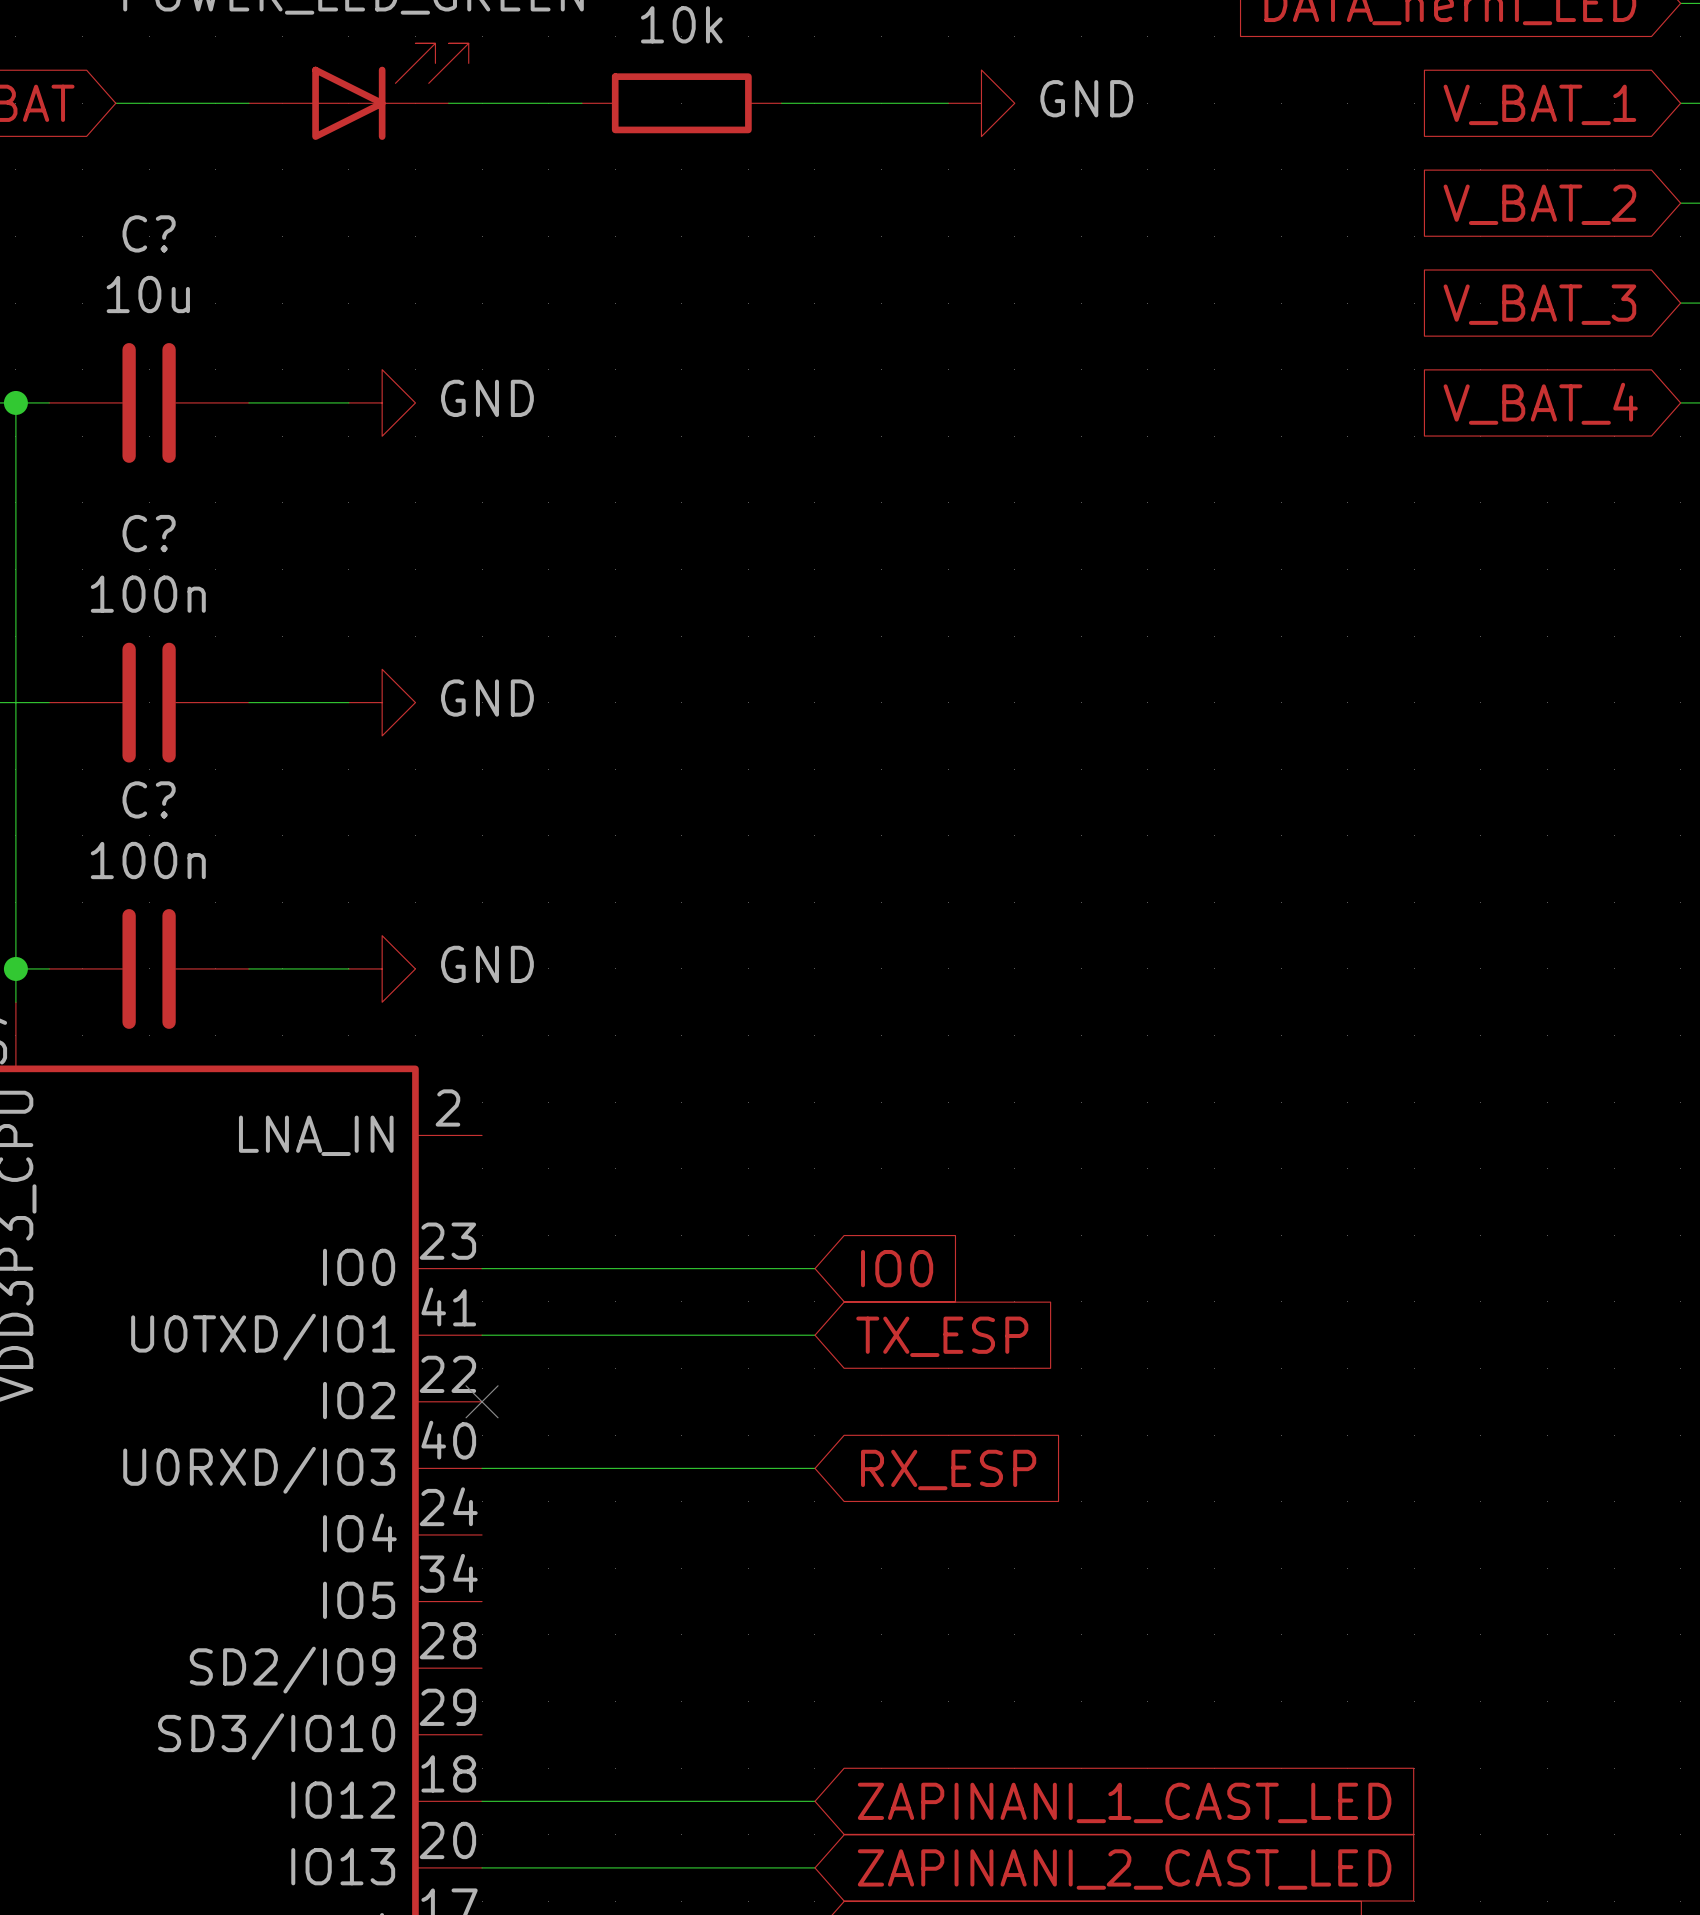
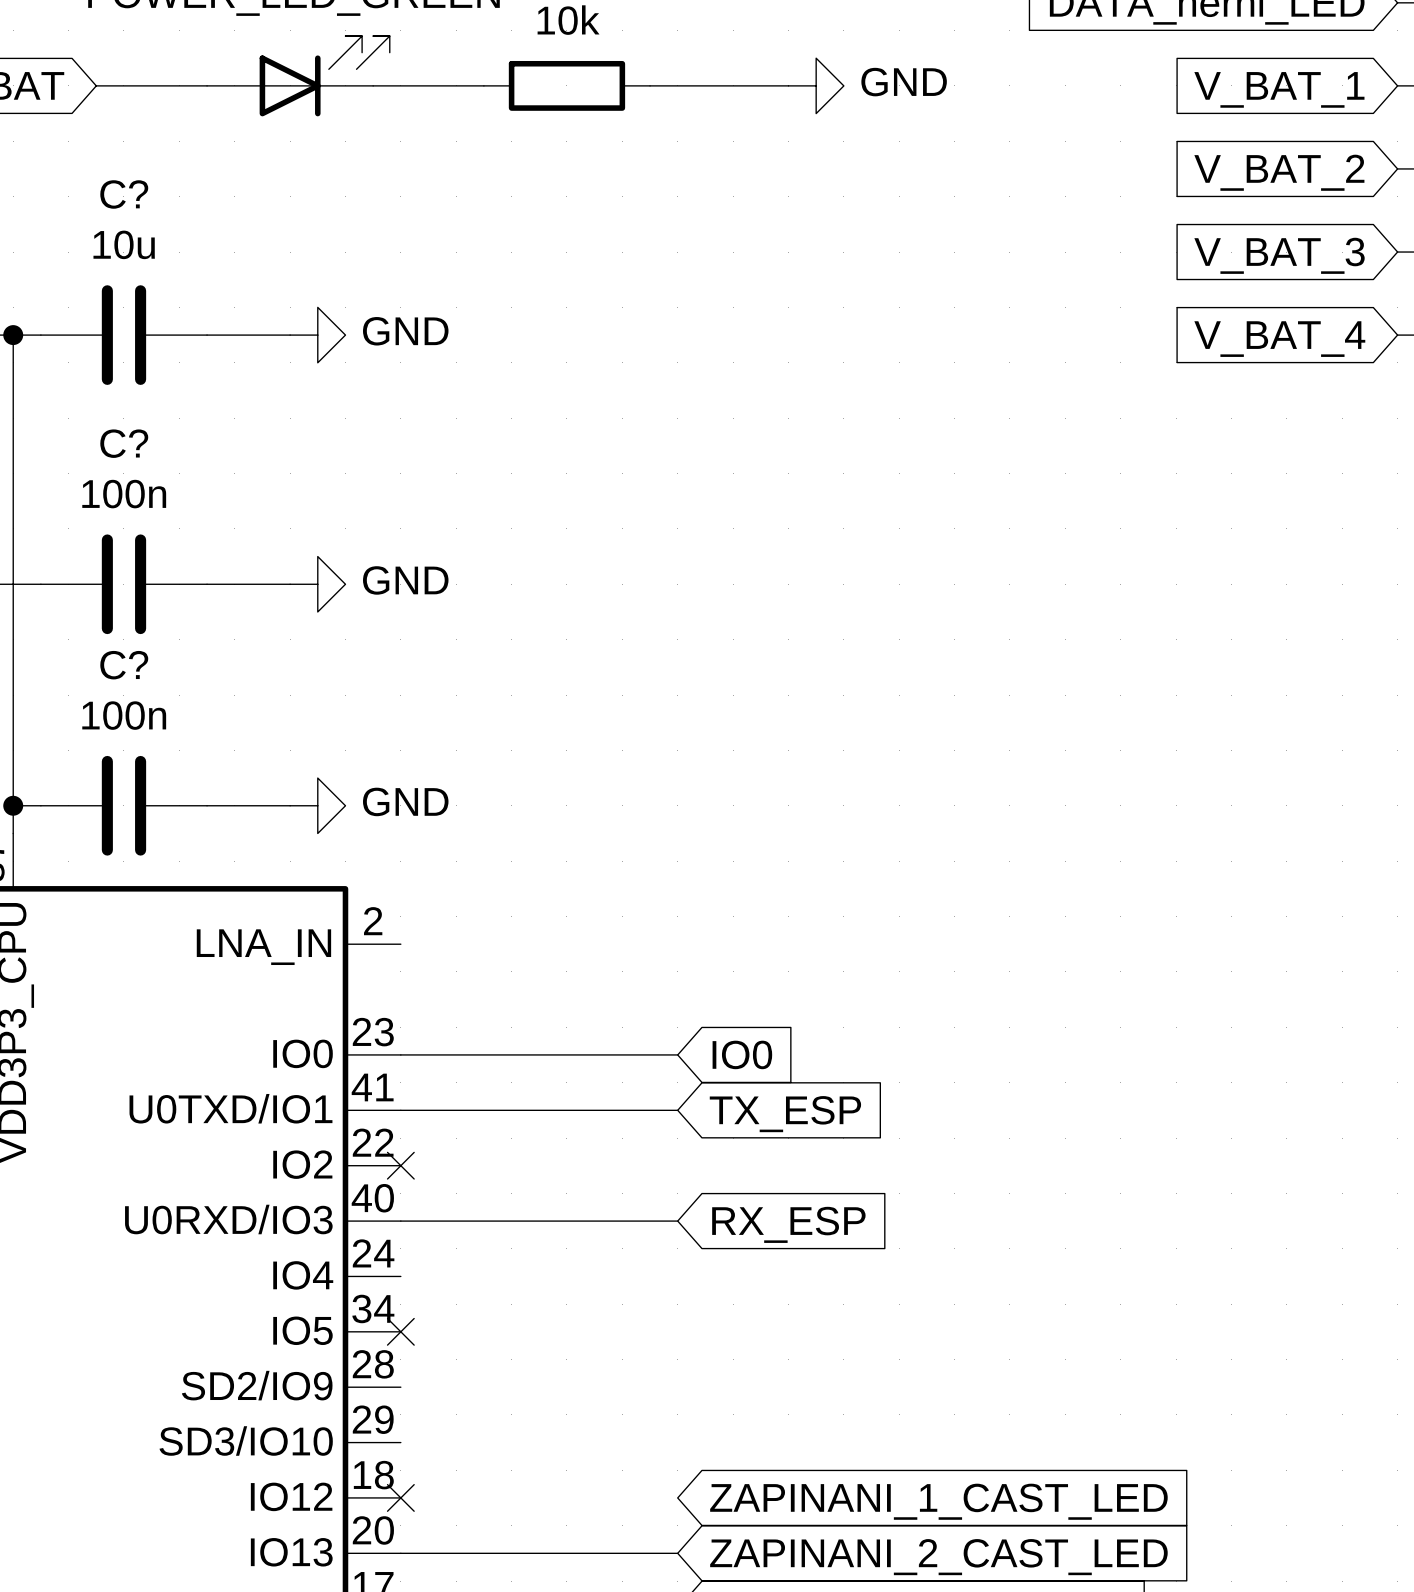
no-connect mark: none -> (400, 1331)
wire: (482, 1801) (814, 1801) -> none
no-connect mark: none -> (400, 1497)

